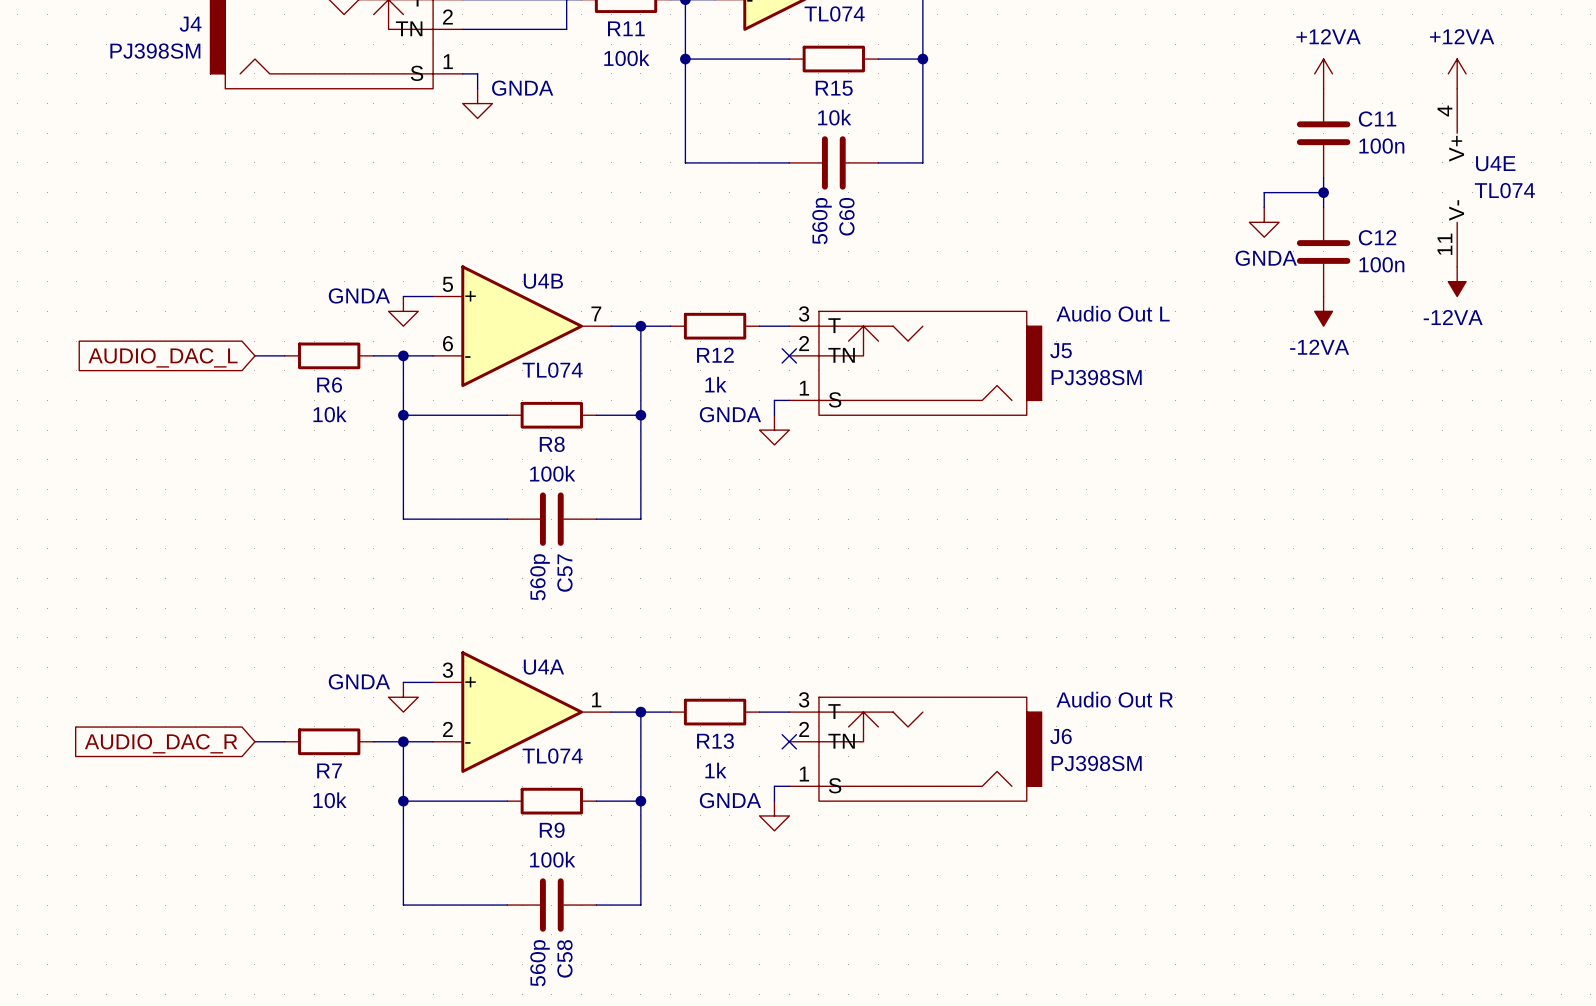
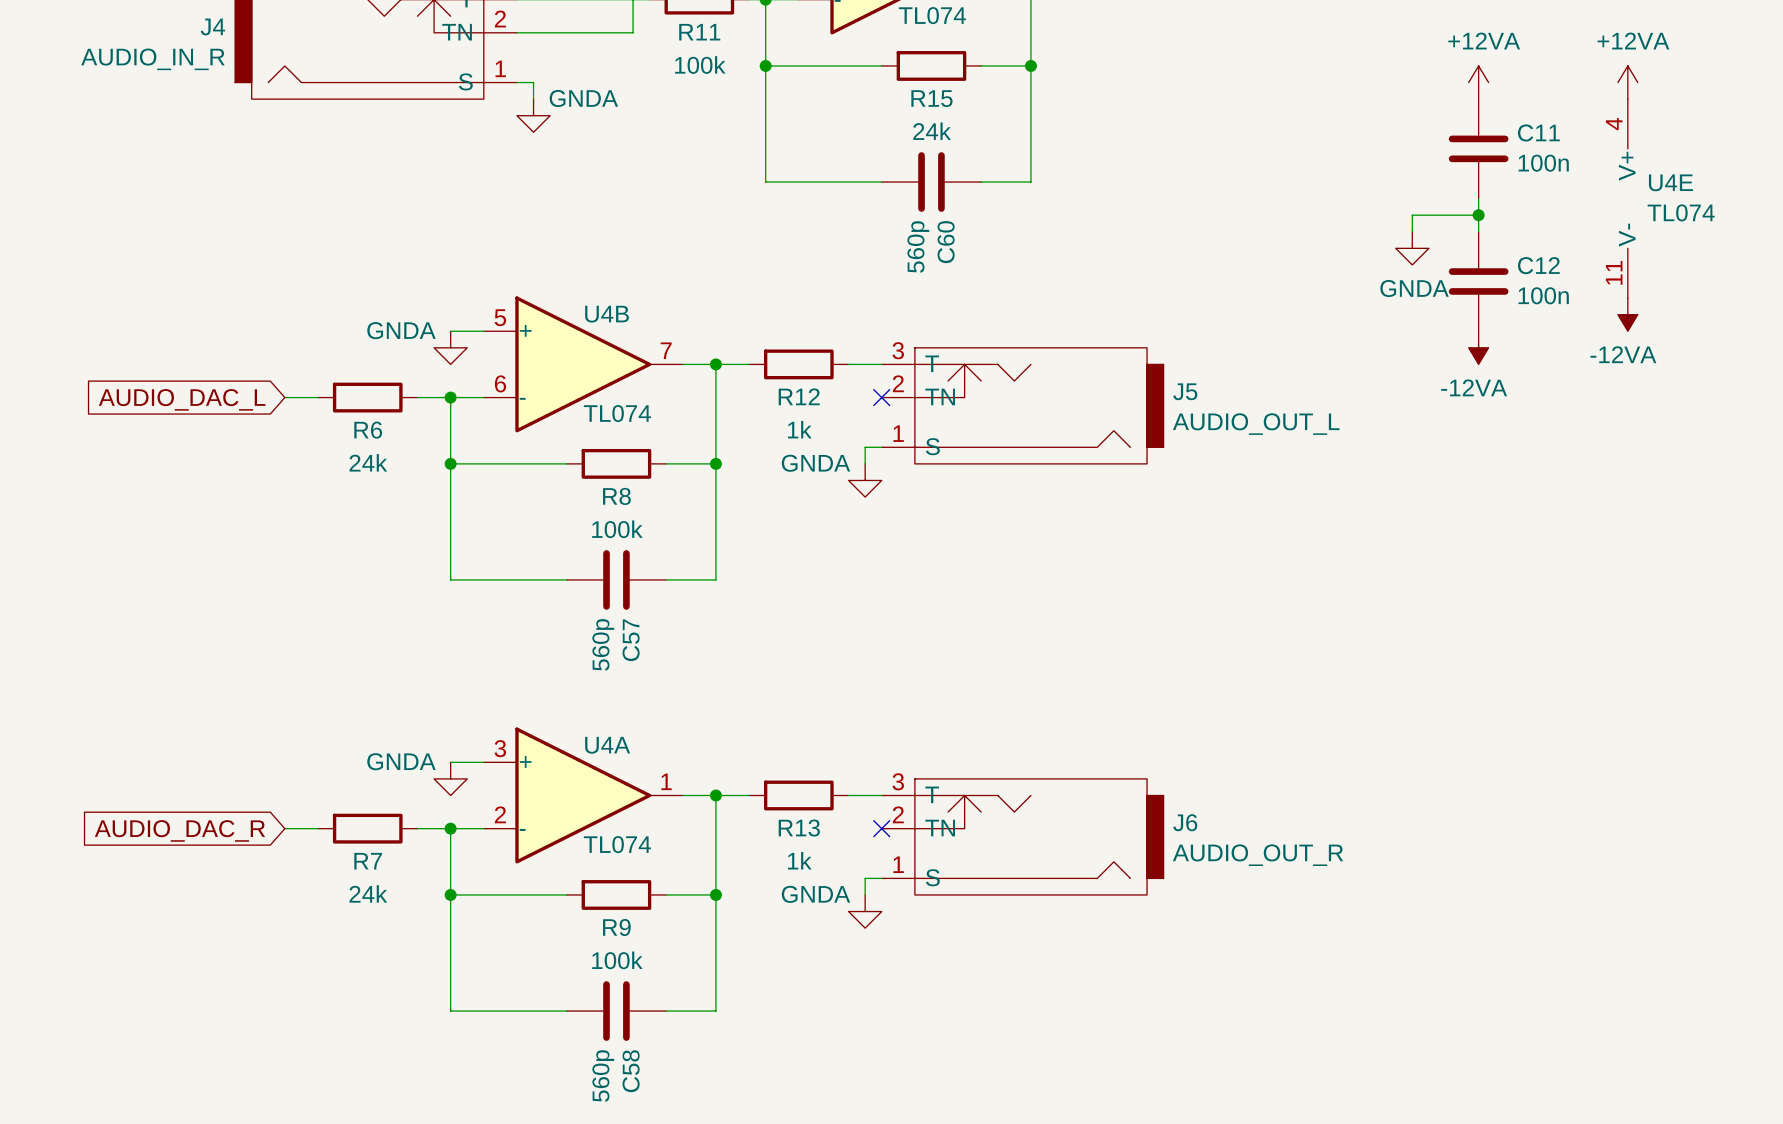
J4 value: PJ398SM (155, 51) -> AUDIO_IN_R (152, 59)
R15 value: 10k (834, 117) -> 24k (932, 131)
text: Audio Out L (1113, 313) -> none
J5 value: PJ398SM (1096, 377) -> AUDIO_OUT_L (1256, 424)
R6 value: 10k (330, 414) -> 24k (368, 462)
text: Audio Out R (1114, 699) -> none
J6 value: PJ398SM (1096, 763) -> AUDIO_OUT_R (1258, 855)
R7 value: 10k (330, 800) -> 24k (368, 893)

